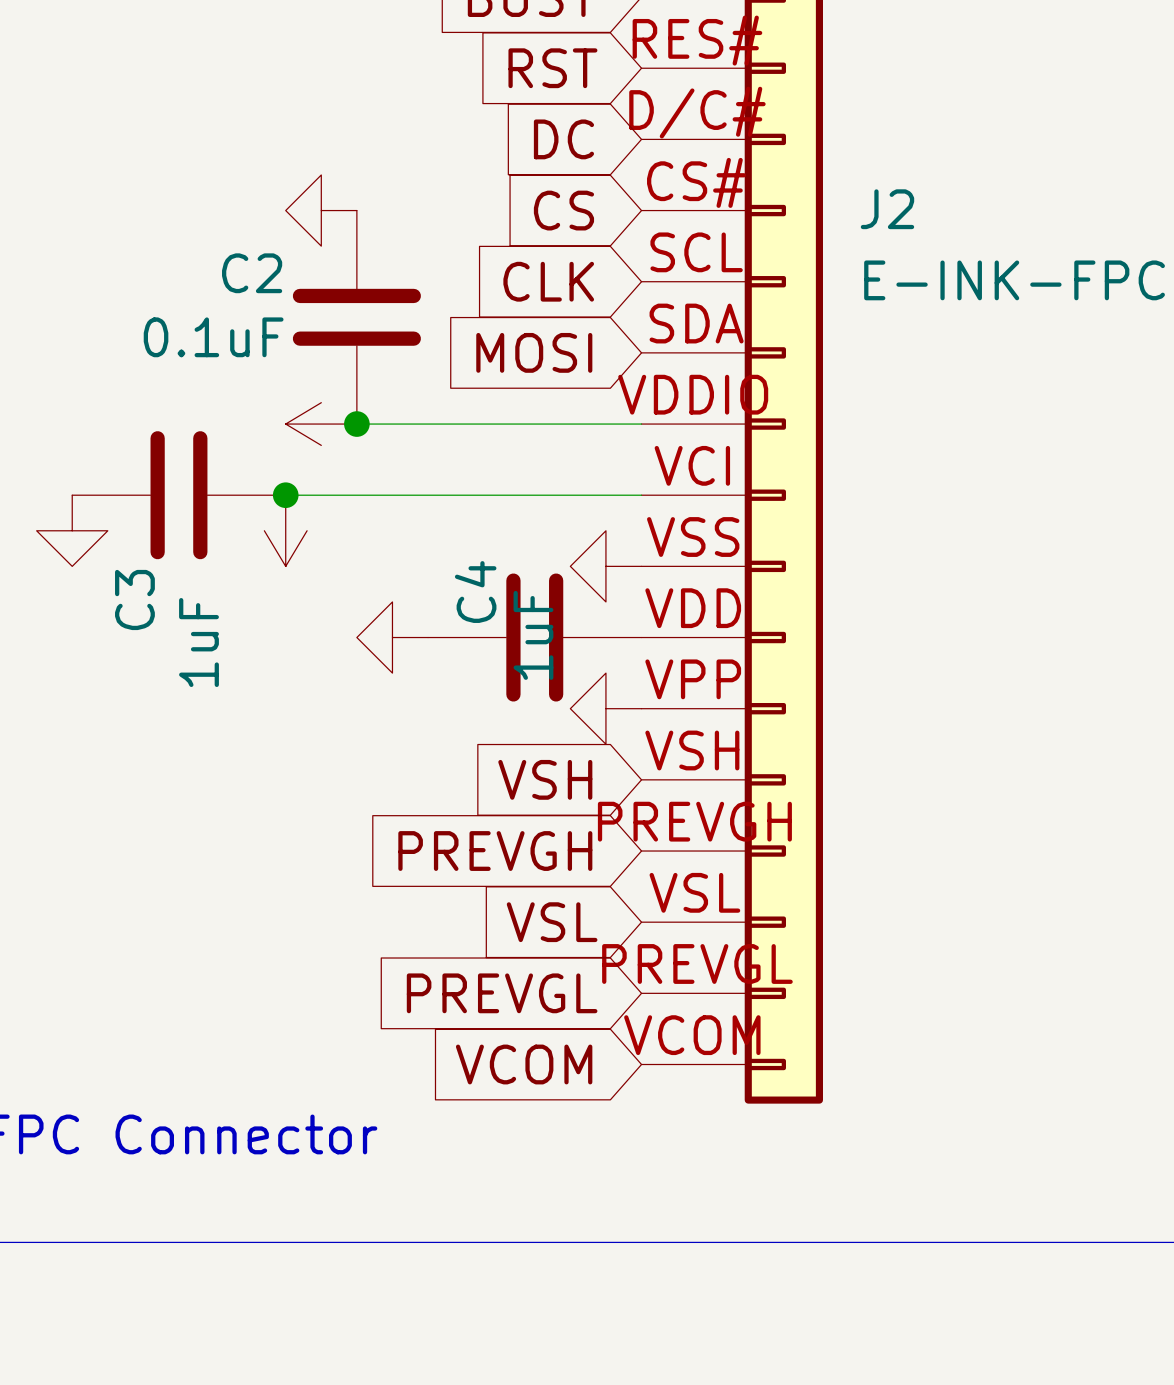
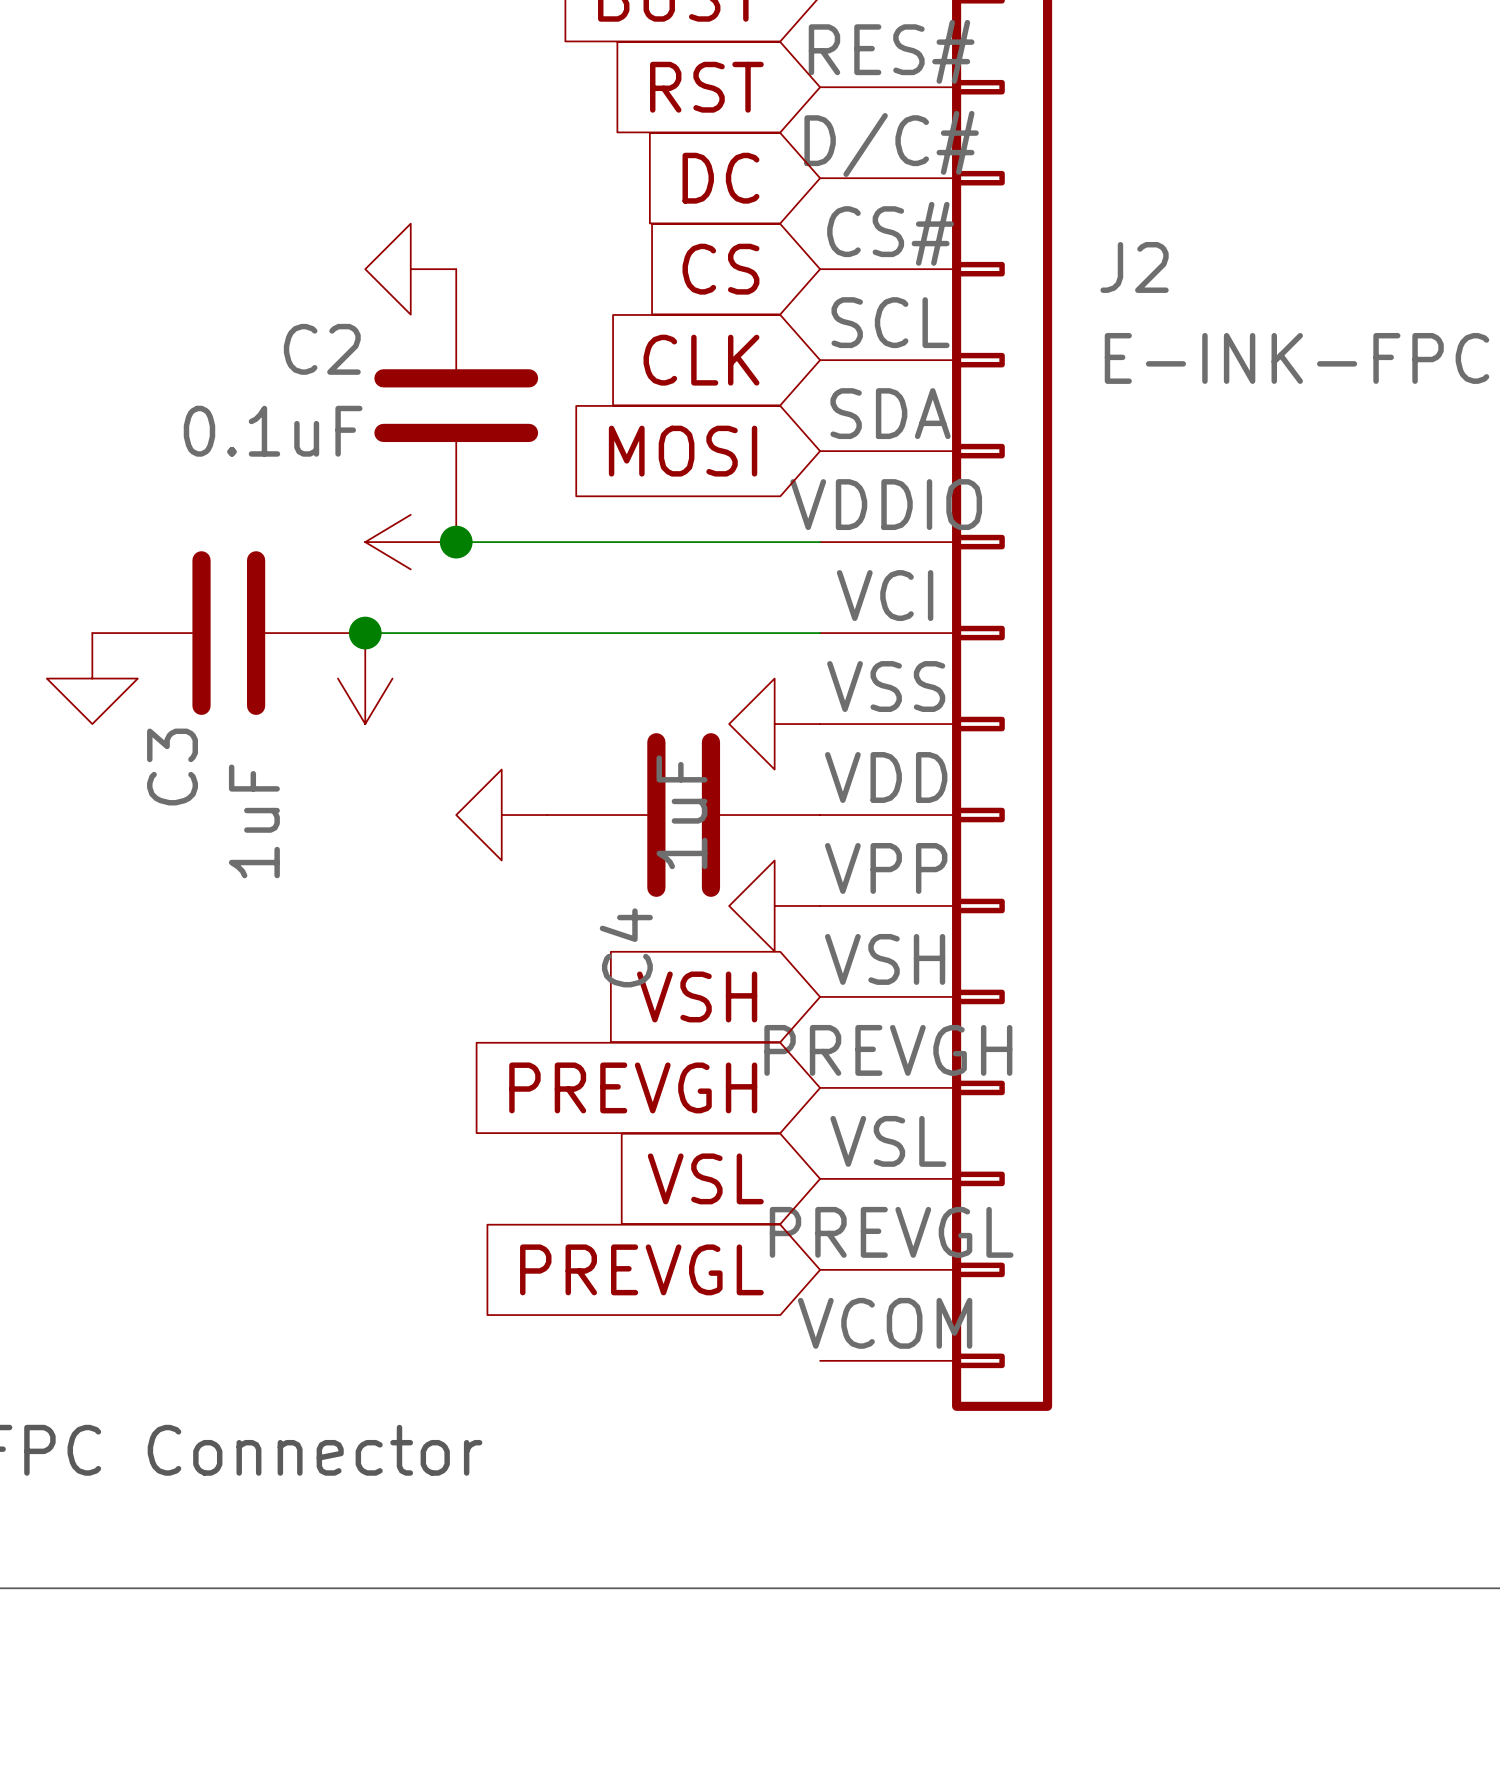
C4 name position: C4 (475, 592) -> C4 (626, 947)
global label: VCOM (524, 1064) -> none

